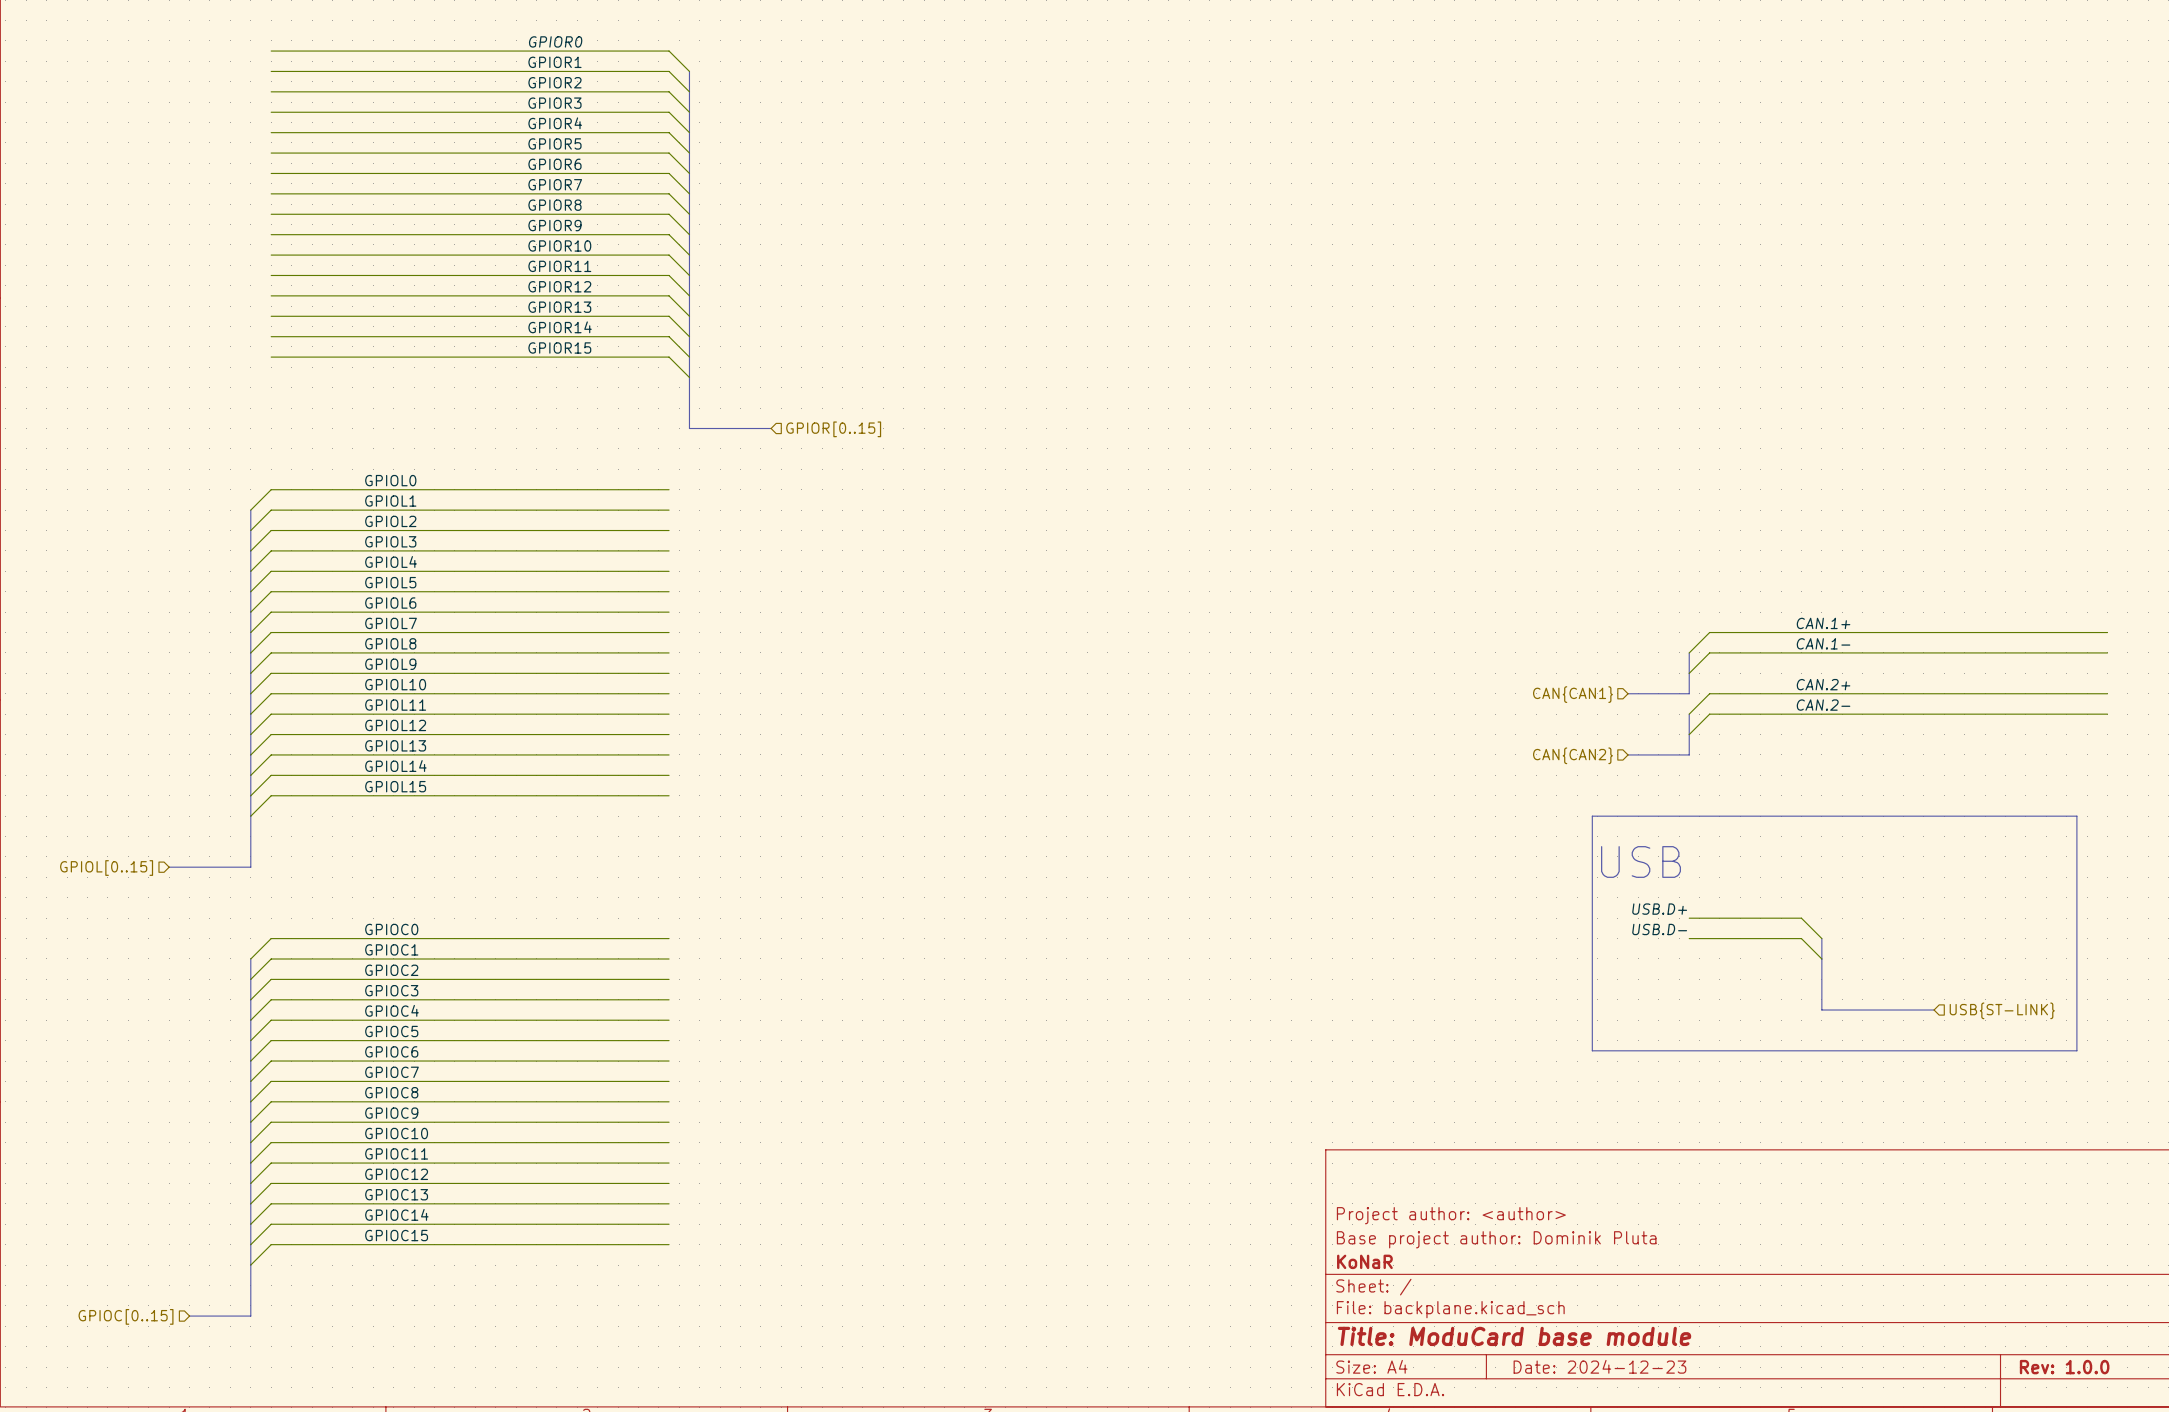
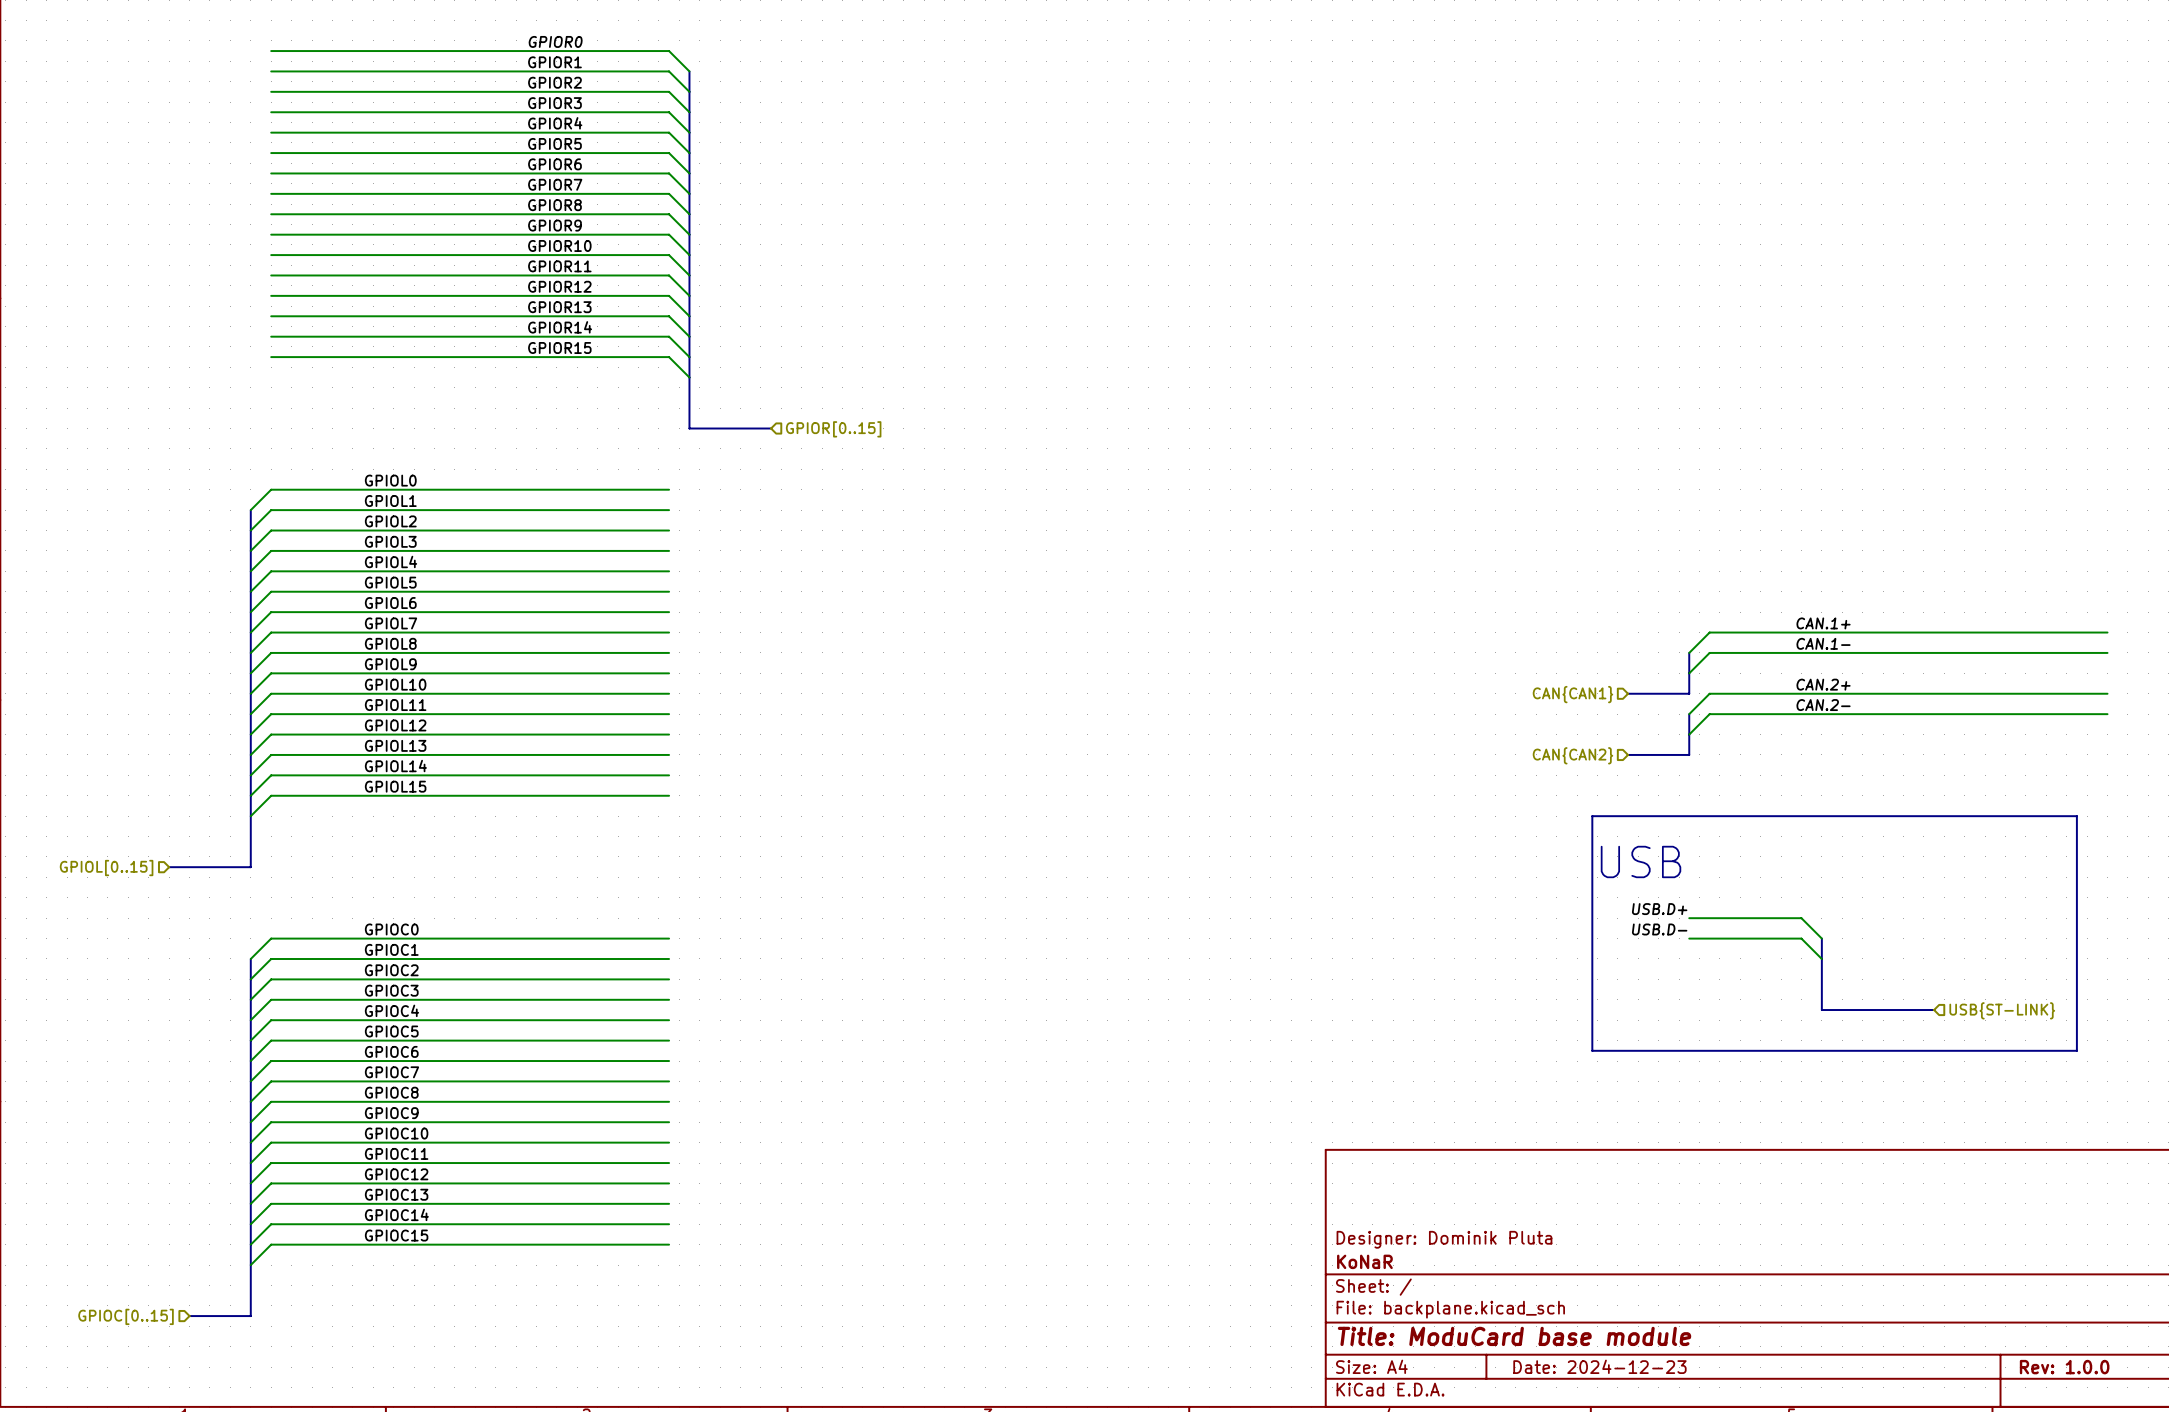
title block: Project author: <author> (1451, 1215) -> none
title block: Base project author: Dominik Pluta (1496, 1239) -> Designer: Dominik Pluta (1444, 1239)

